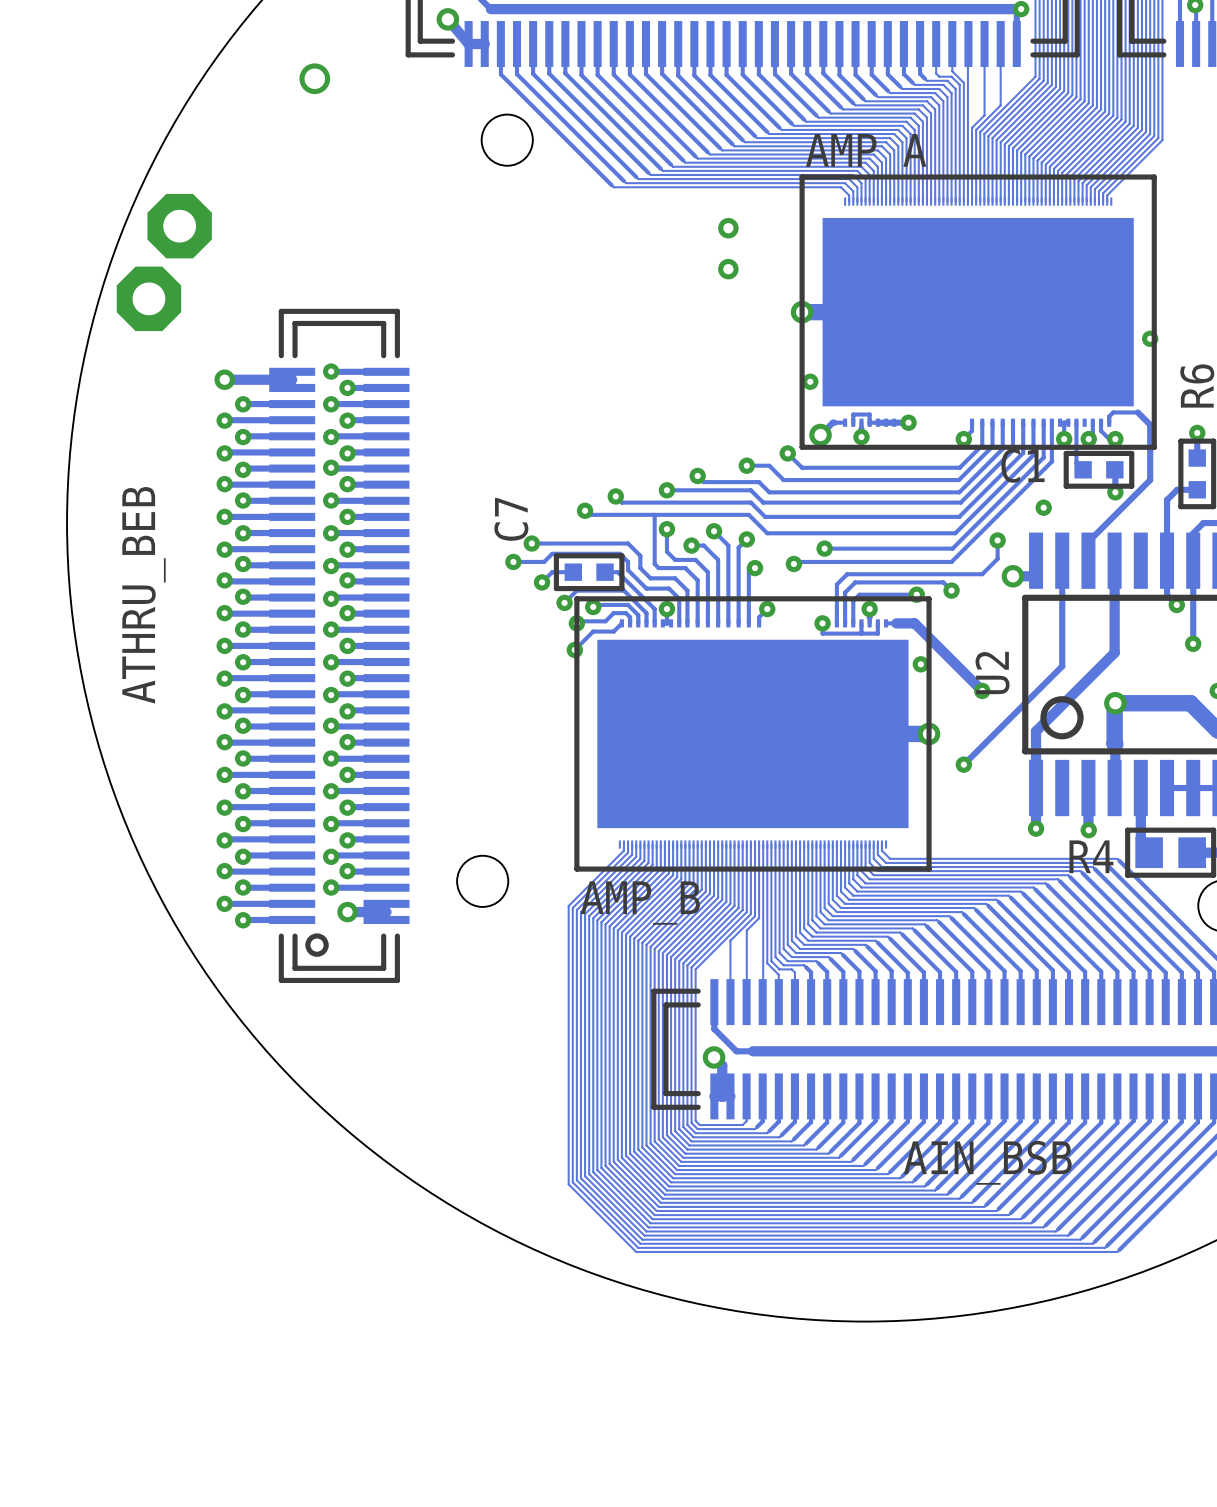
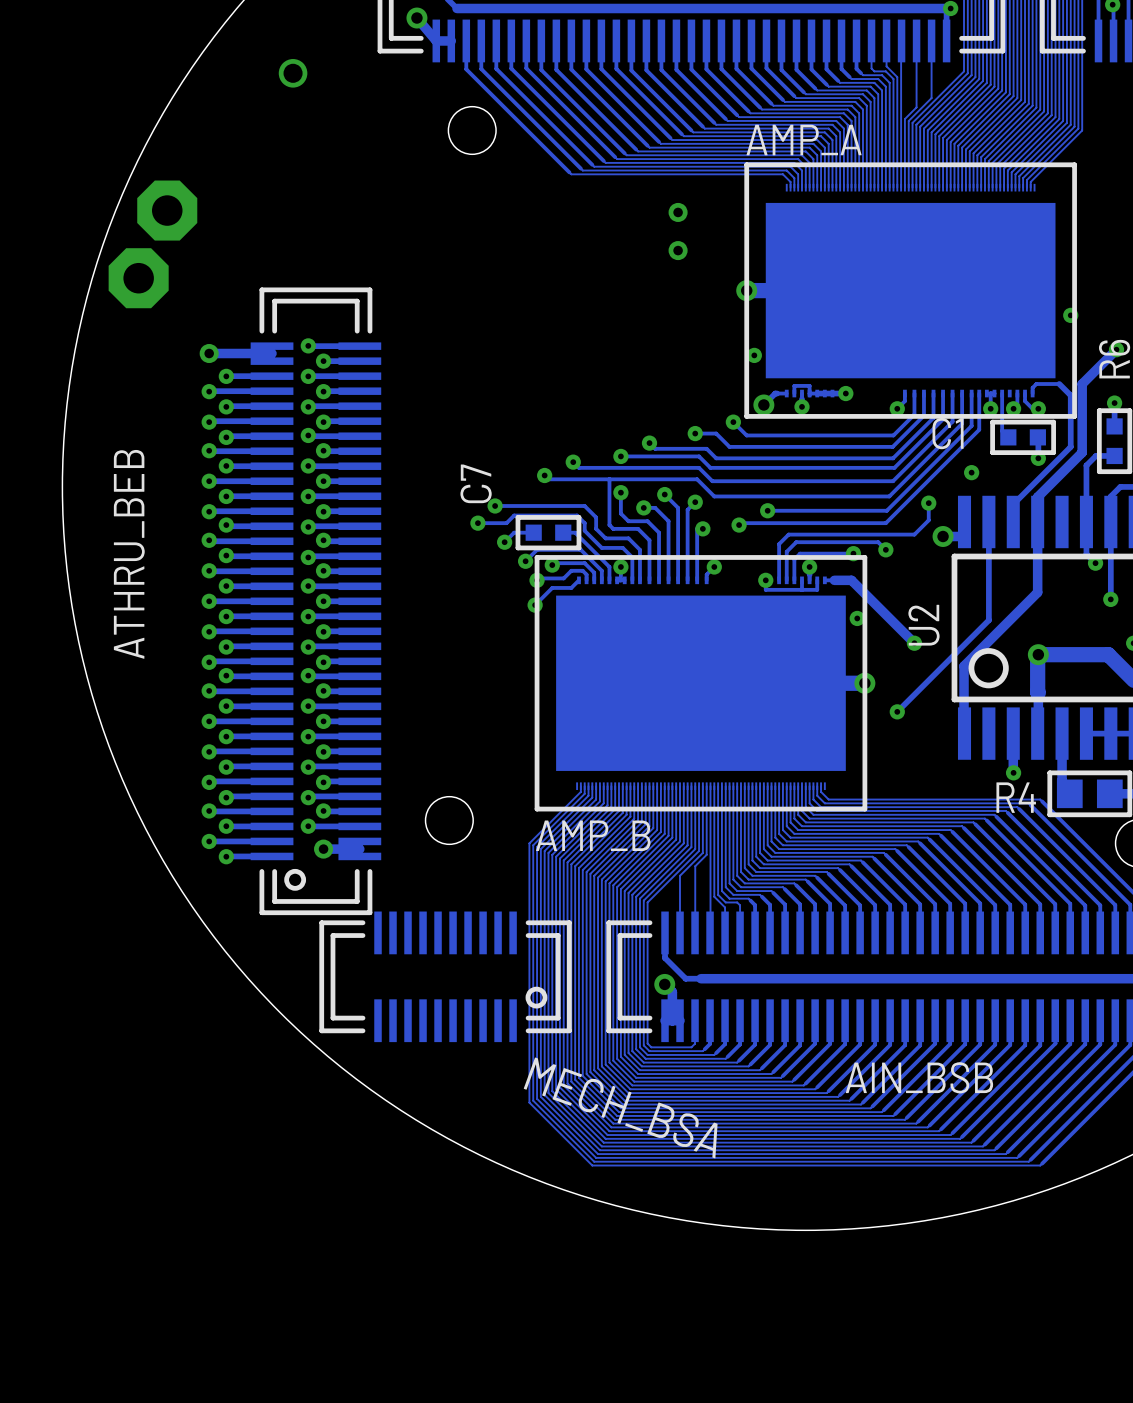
track: none -> (1116, 349) (1082, 384) (1082, 452) (1037, 497) (1037, 521)
via: none -> (1116, 349)
track: (1114, 636) (1114, 652) (1036, 731) (1036, 828) -> (1037, 592) (964, 666) (964, 733)
via: (1036, 828) -> none
MECH_BSA: none -> (445, 976)

